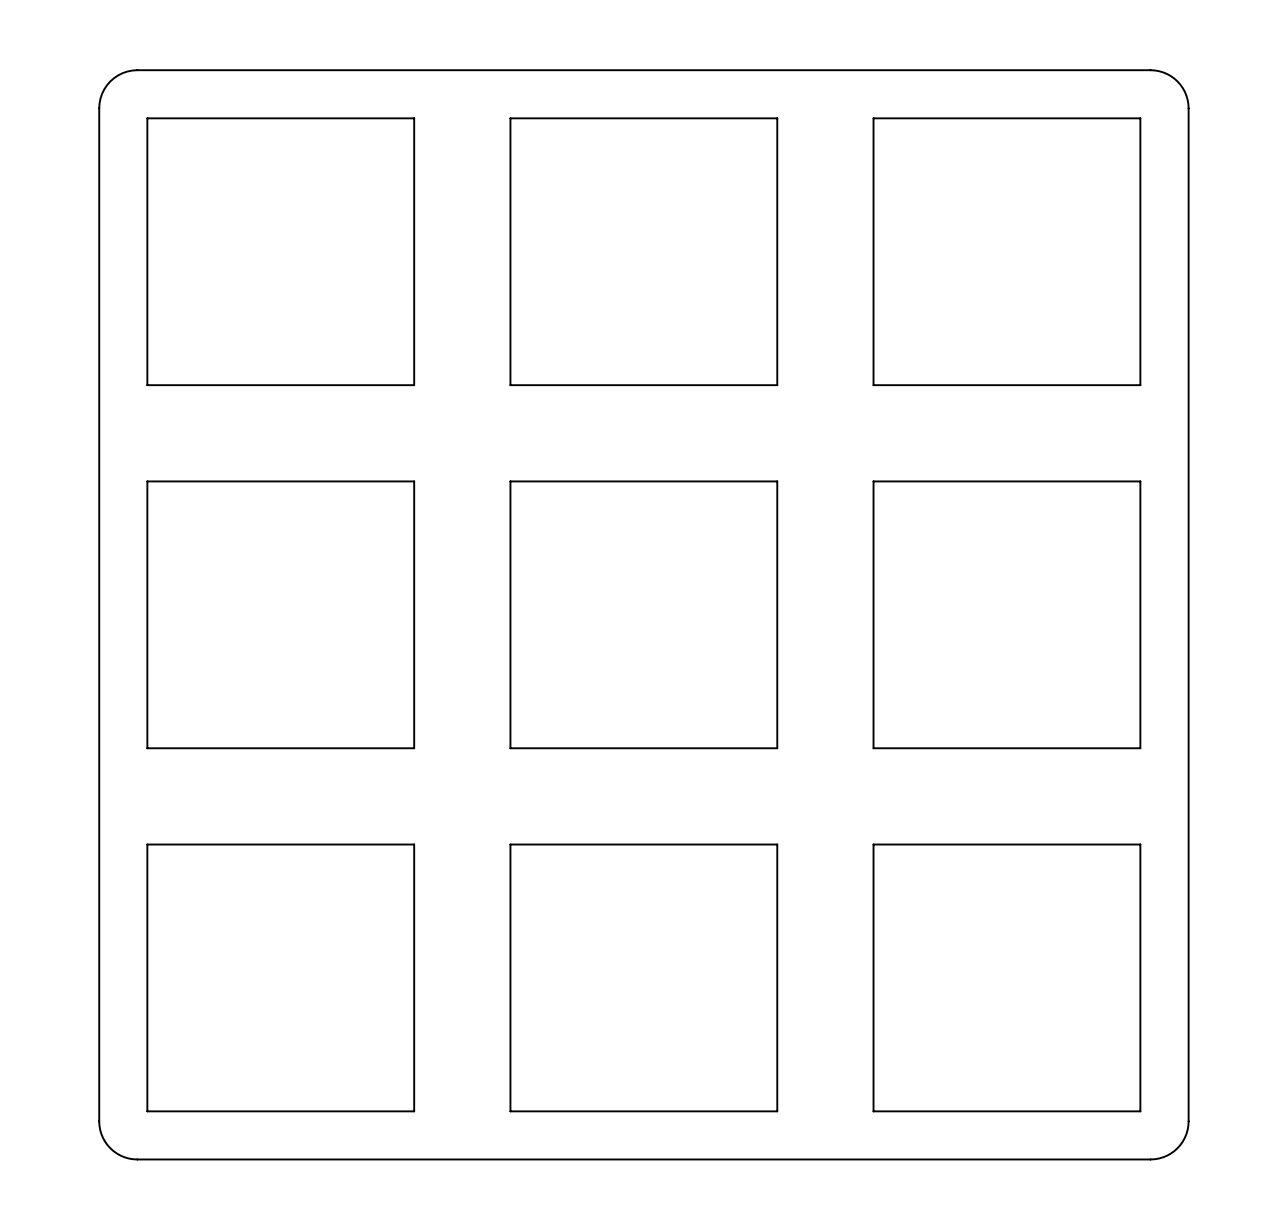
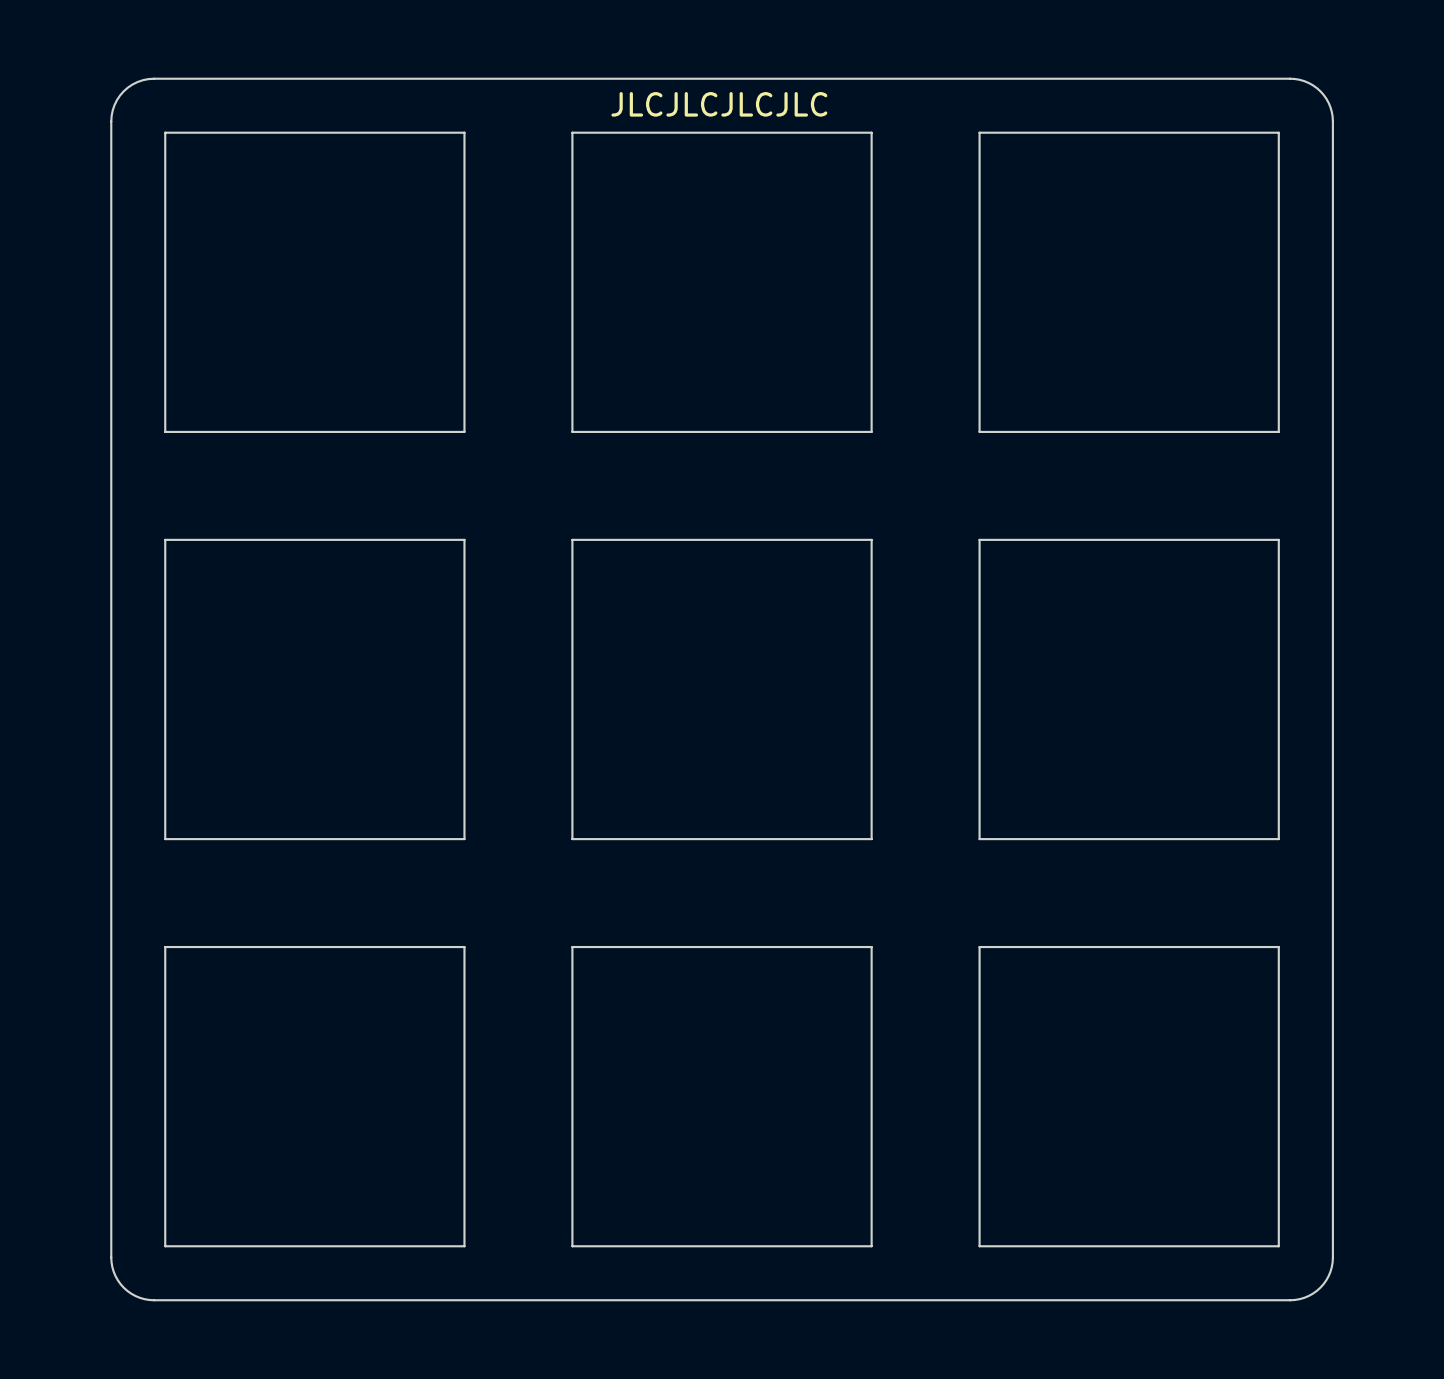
text: none -> JLCJLCJLCJLC (719, 104)

